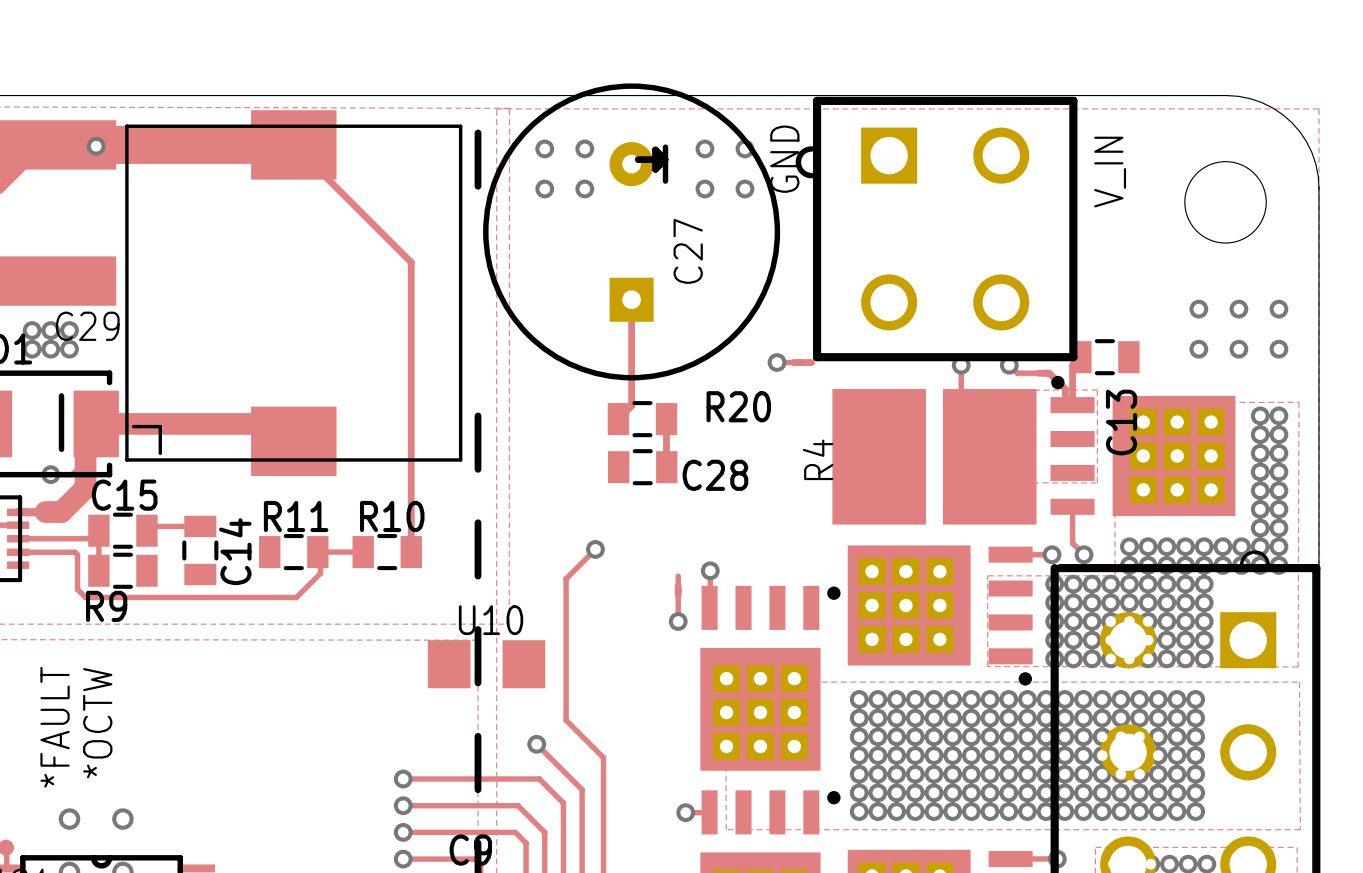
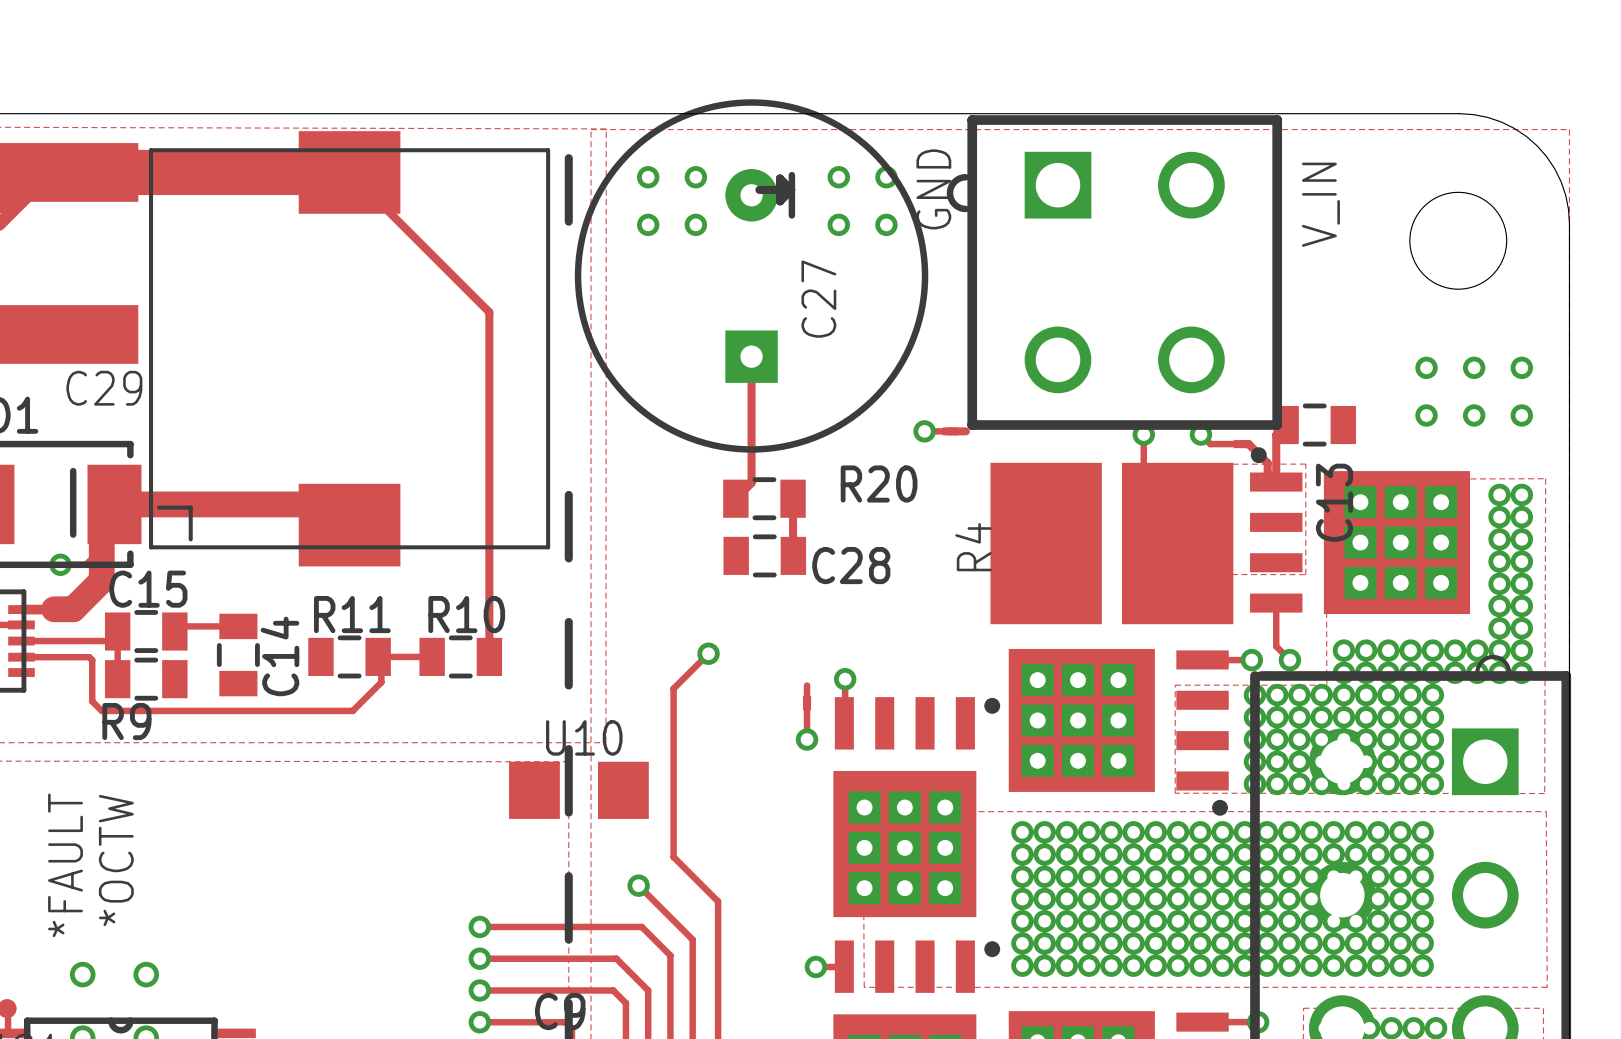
via: (96, 146) -> none
via: (32, 330) -> none
via: (50, 330) -> none
via: (69, 330) -> none
via: (32, 349) -> none
via: (50, 349) -> none
via: (69, 349) -> none

